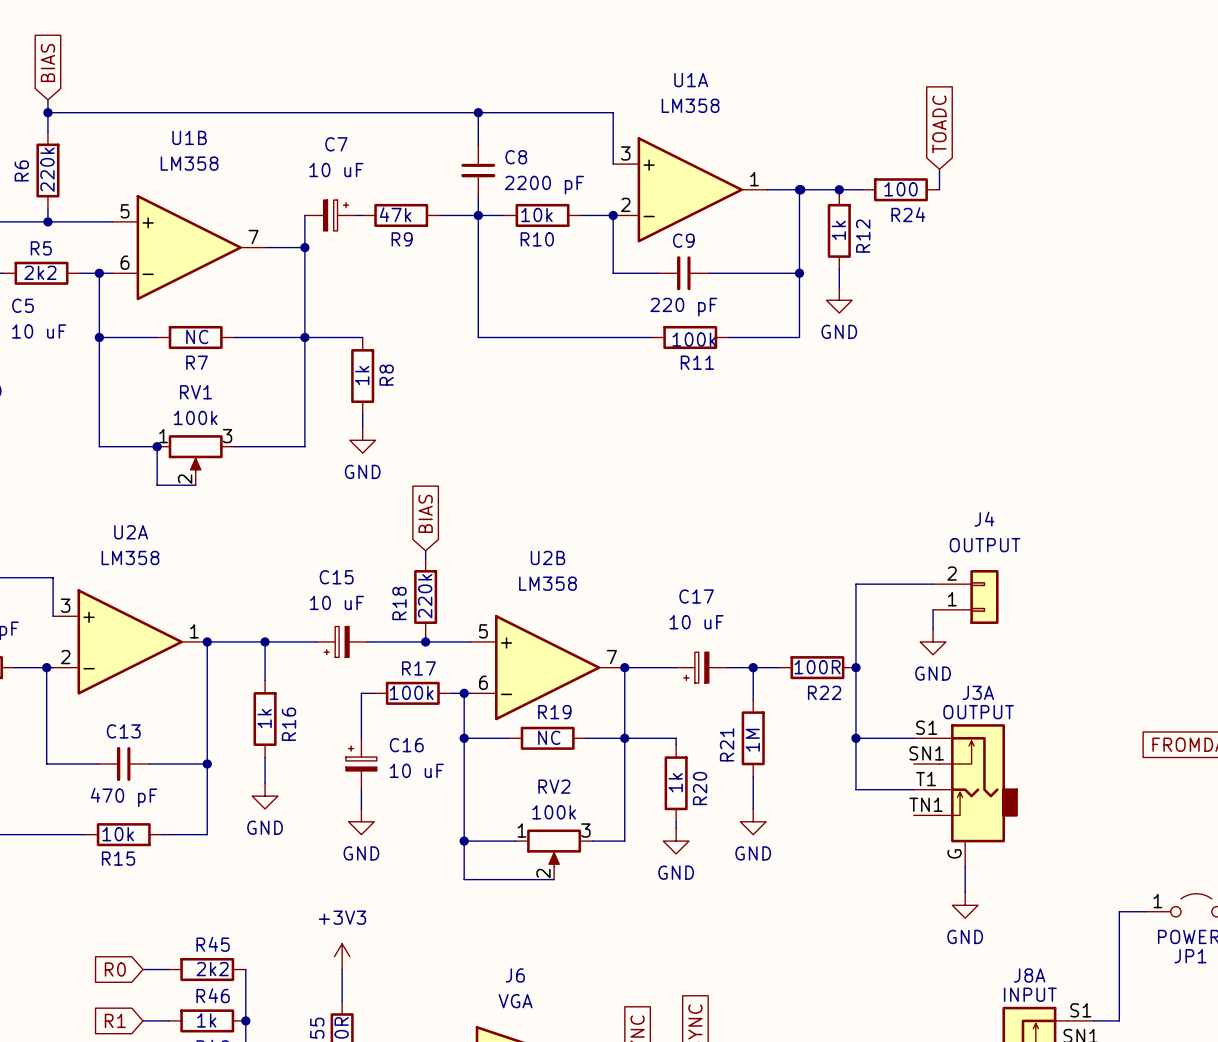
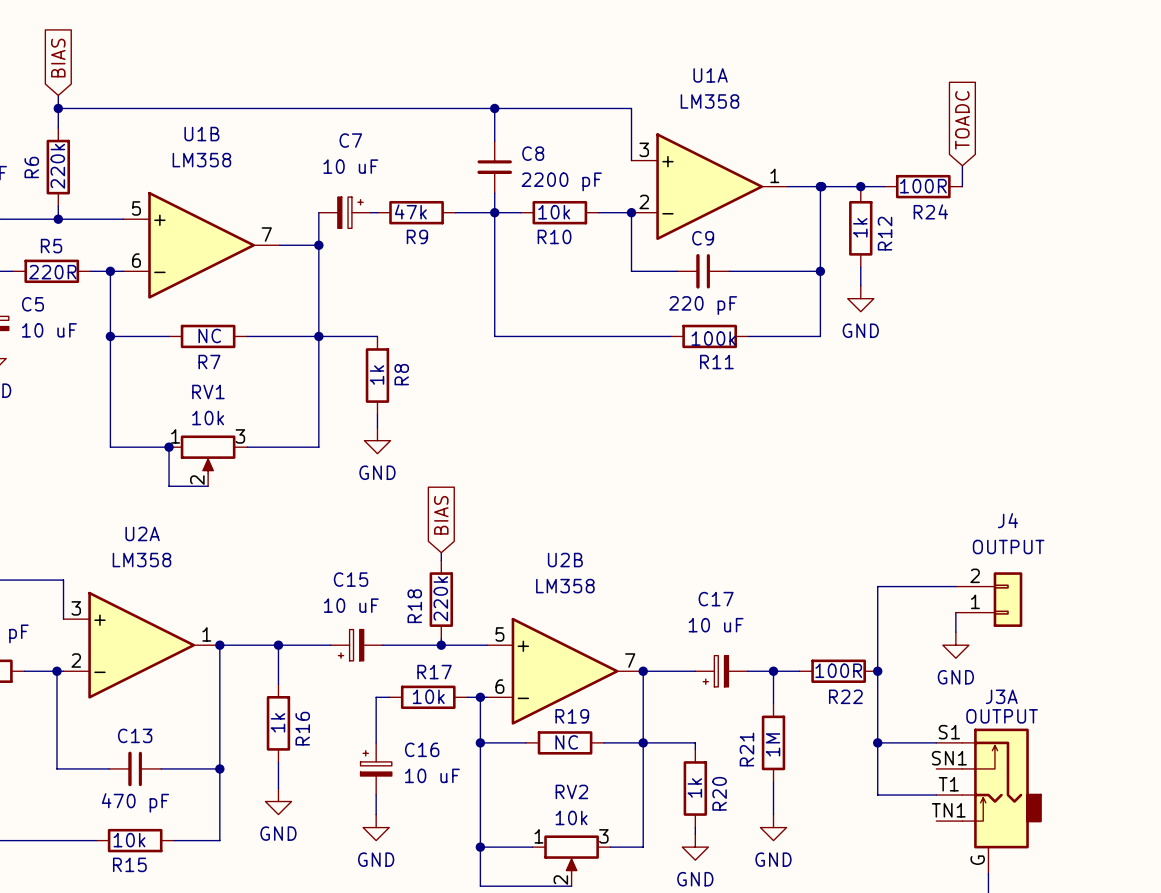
R24 value: 100 (901, 189) -> 100R (923, 186)
R5 value: 2k2 (40, 272) -> 220R (52, 272)
RV1 value: 100k (195, 417) -> 10k (208, 418)
R17 value: 100k (411, 692) -> 10k (428, 696)
RV2 value: 100k (554, 812) -> 10k (571, 817)

